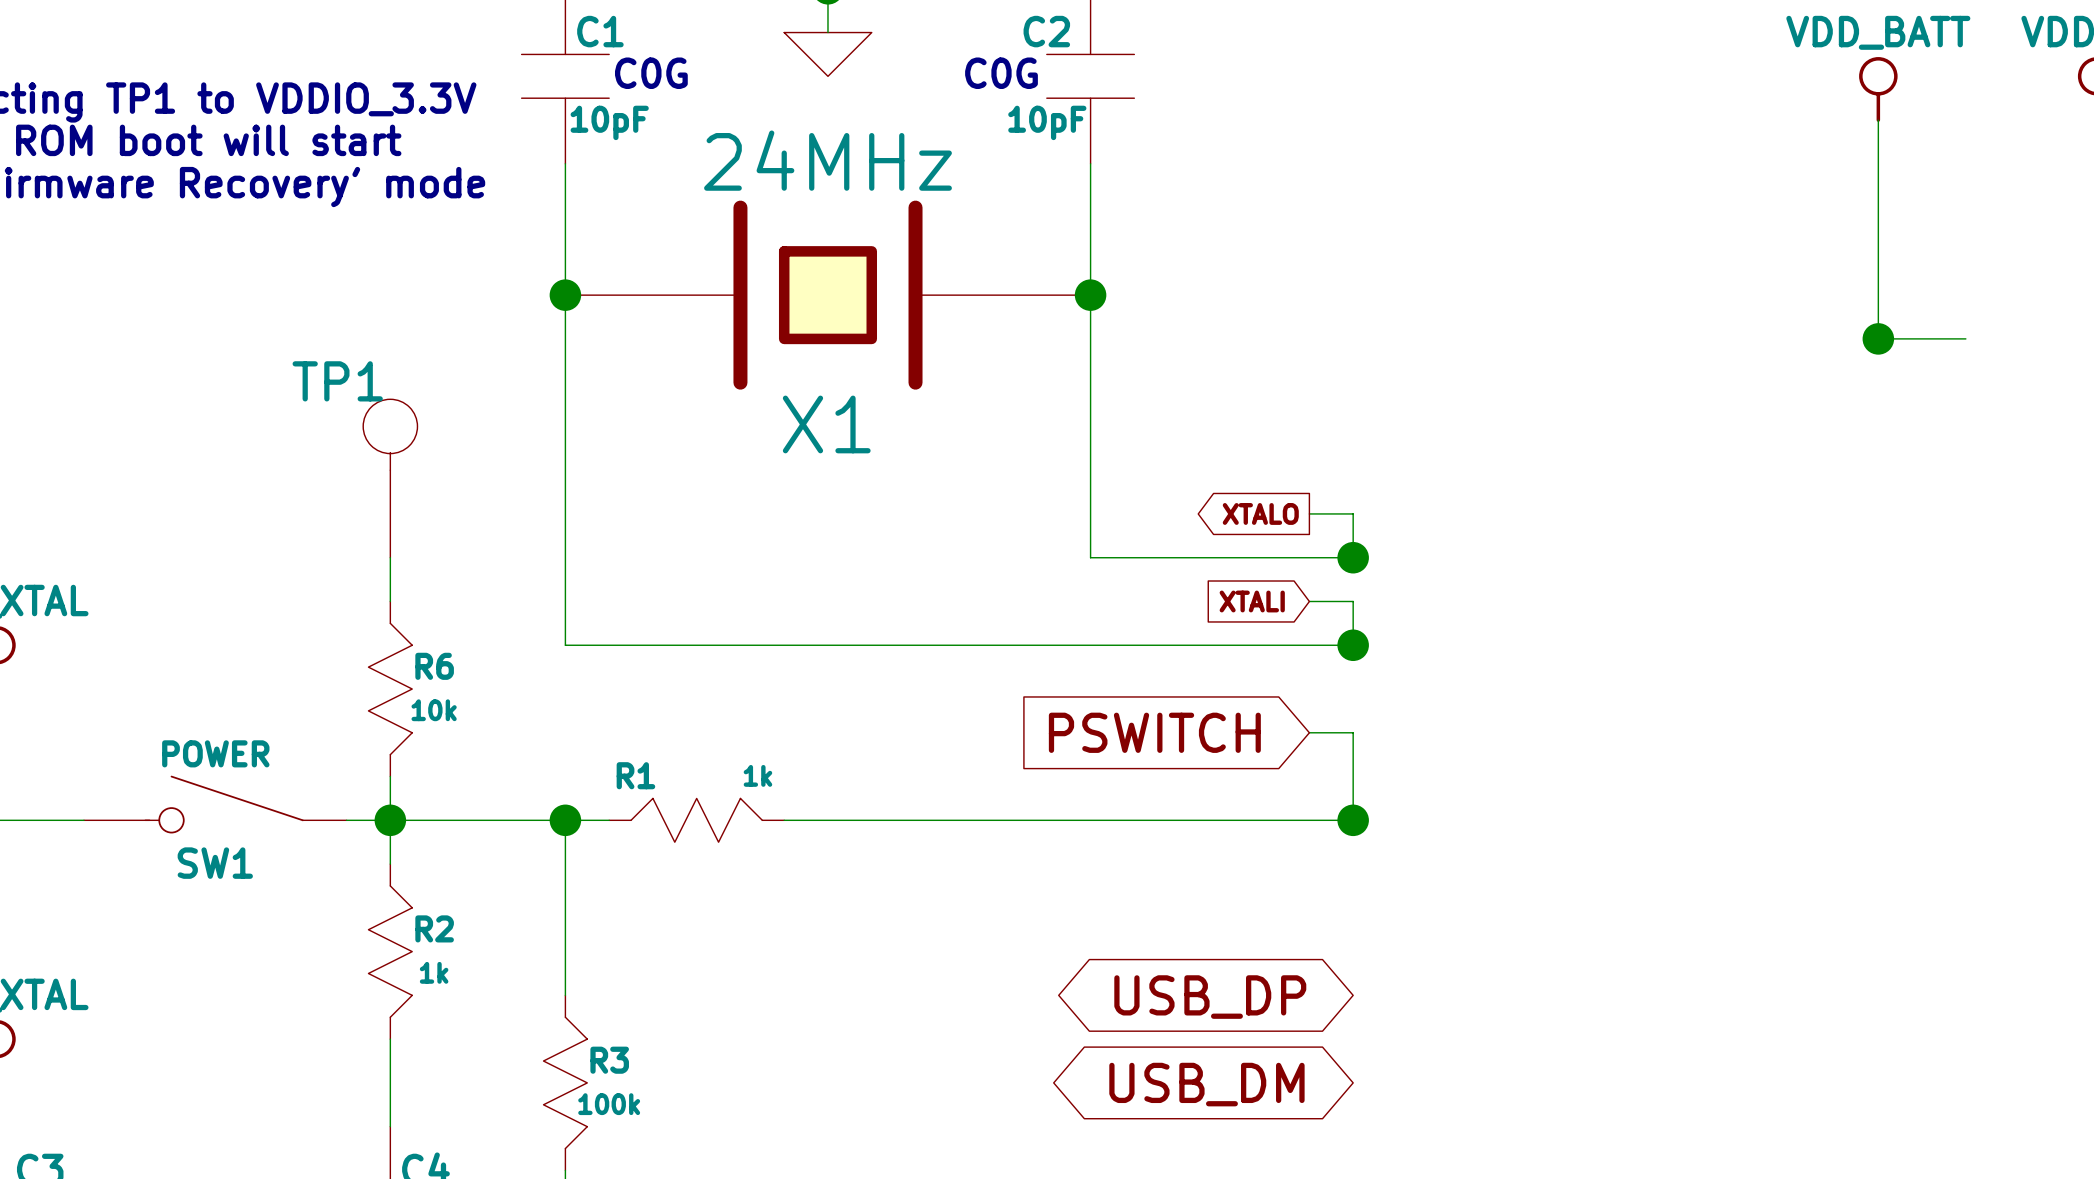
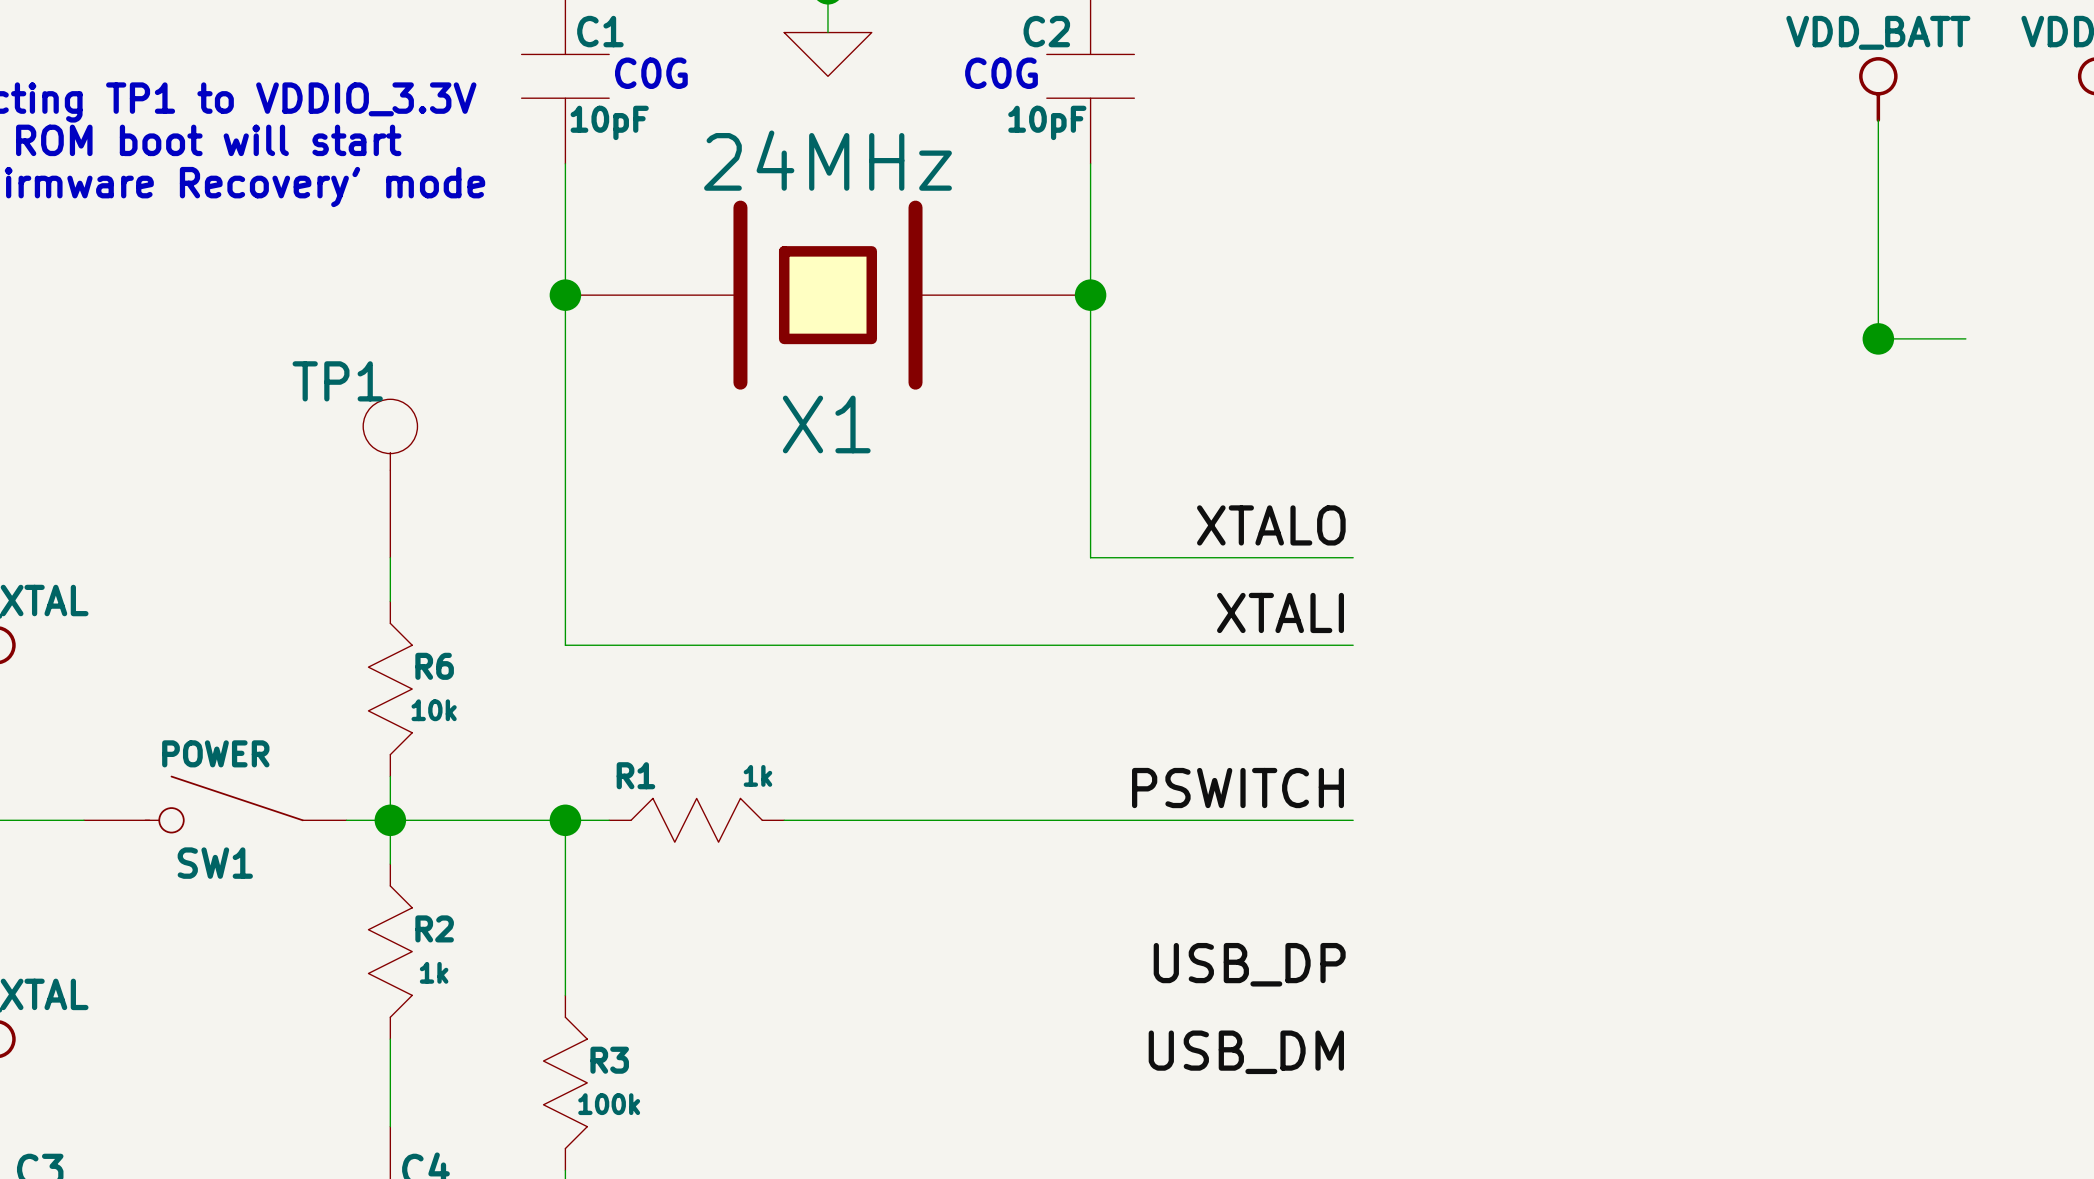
global label: XTALO (1260, 513) -> none
wire: (1309, 513) (1353, 513) (1353, 557) -> none
label: none -> XTALO (1271, 525)
junction: (1353, 557) -> none
global label: XTALI (1252, 601) -> none
wire: (1309, 601) (1353, 601) (1353, 645) -> none
label: none -> XTALI (1280, 612)
junction: (1353, 645) -> none
global label: PSWITCH (1154, 732) -> none
wire: (1309, 732) (1353, 732) (1353, 820) -> none
label: none -> PSWITCH (1238, 788)
junction: (1353, 820) -> none
label: none -> USB_DP (1249, 964)
global label: USB_DP (1210, 997) -> none
label: none -> USB_DM (1246, 1052)
global label: USB_DM (1206, 1084) -> none

